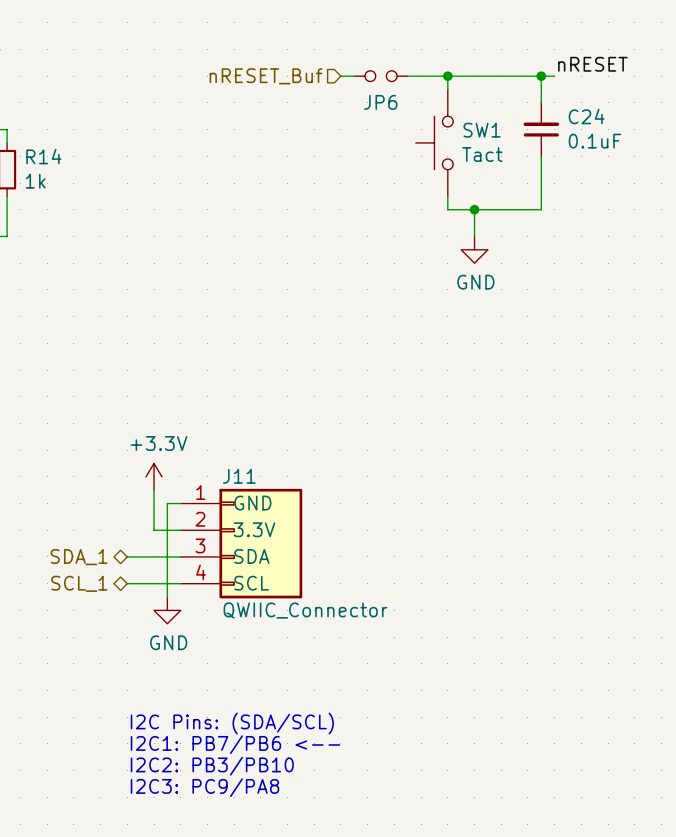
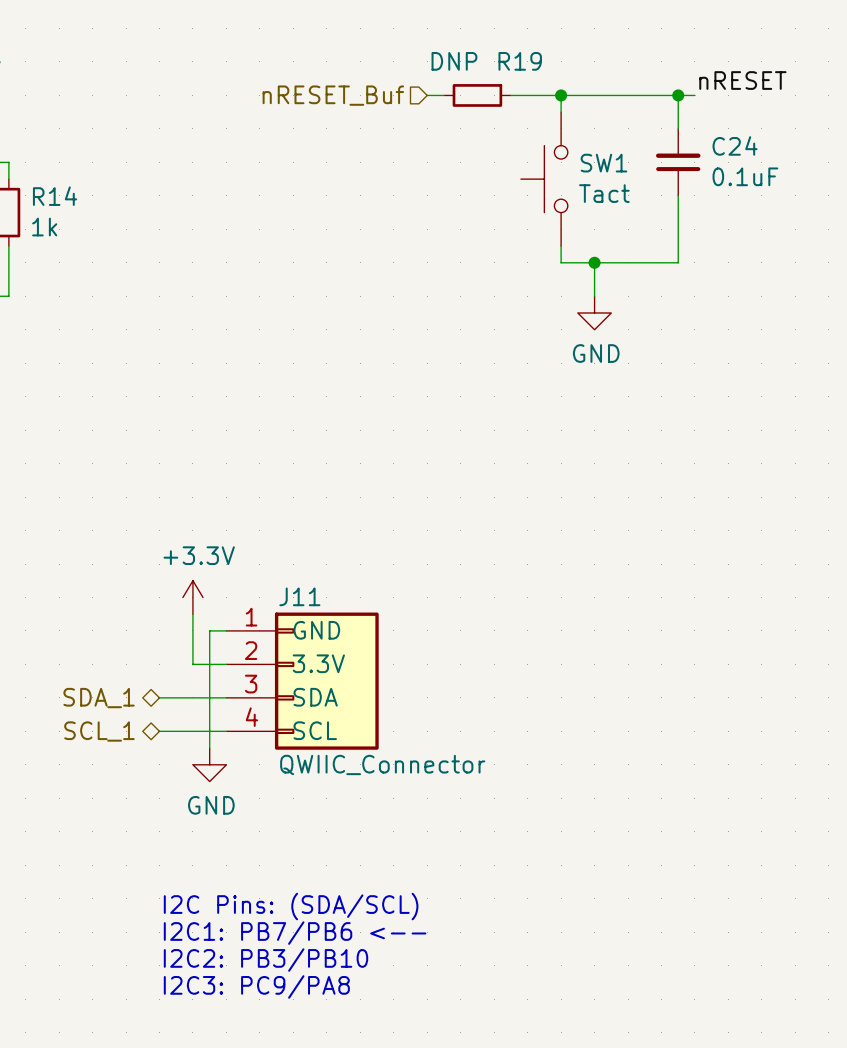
JP6: (381, 76) -> none
R19: none -> DNP (477, 95)

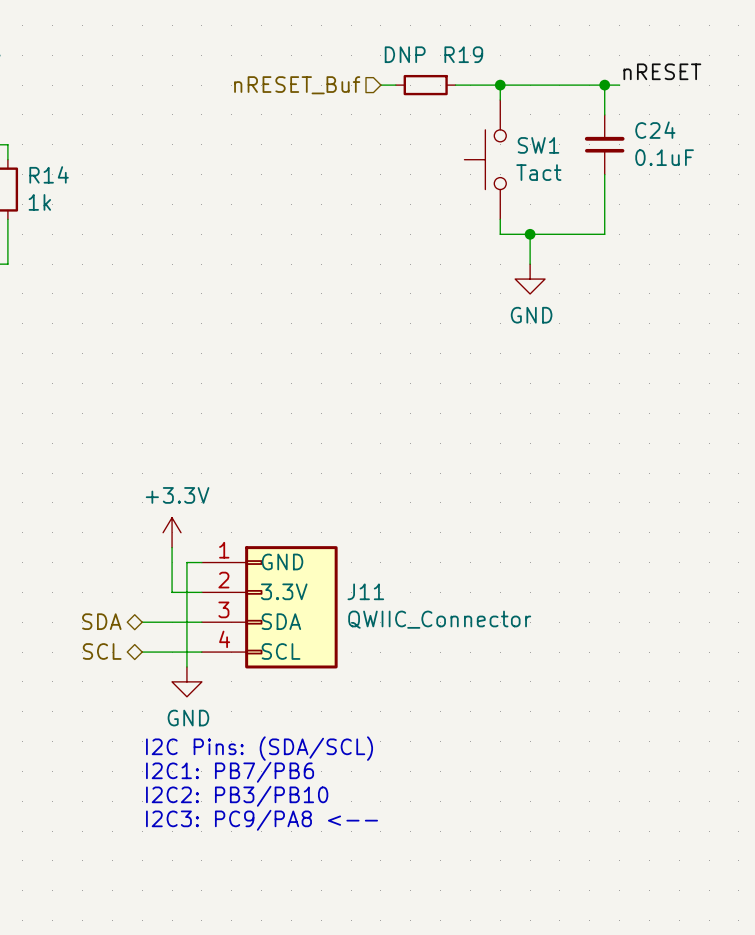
J11 name position: J11 (299, 596) -> J11 (365, 591)
hierarchical label: SDA_1 (99, 698) -> SDA (101, 621)
hierarchical label: SCL_1 (99, 731) -> SCL (102, 651)
J11 value position: QWIIC_Connector (382, 764) -> QWIIC_Connector (439, 619)
text: none -> I2C1: PB7/PB6 (230, 772)
text position: I2C Pins: (SDA/SCL) (291, 906) -> I2C Pins: (SDA/SCL) (259, 748)
text: I2C1: PB7/PB6 <-- (295, 933) -> I2C3: PC9/PA8 <-- (262, 820)
text position: I2C2: PB3/PB10 (265, 960) -> I2C2: PB3/PB10 (237, 796)
text: I2C3: PC9/PA8 (256, 986) -> none

